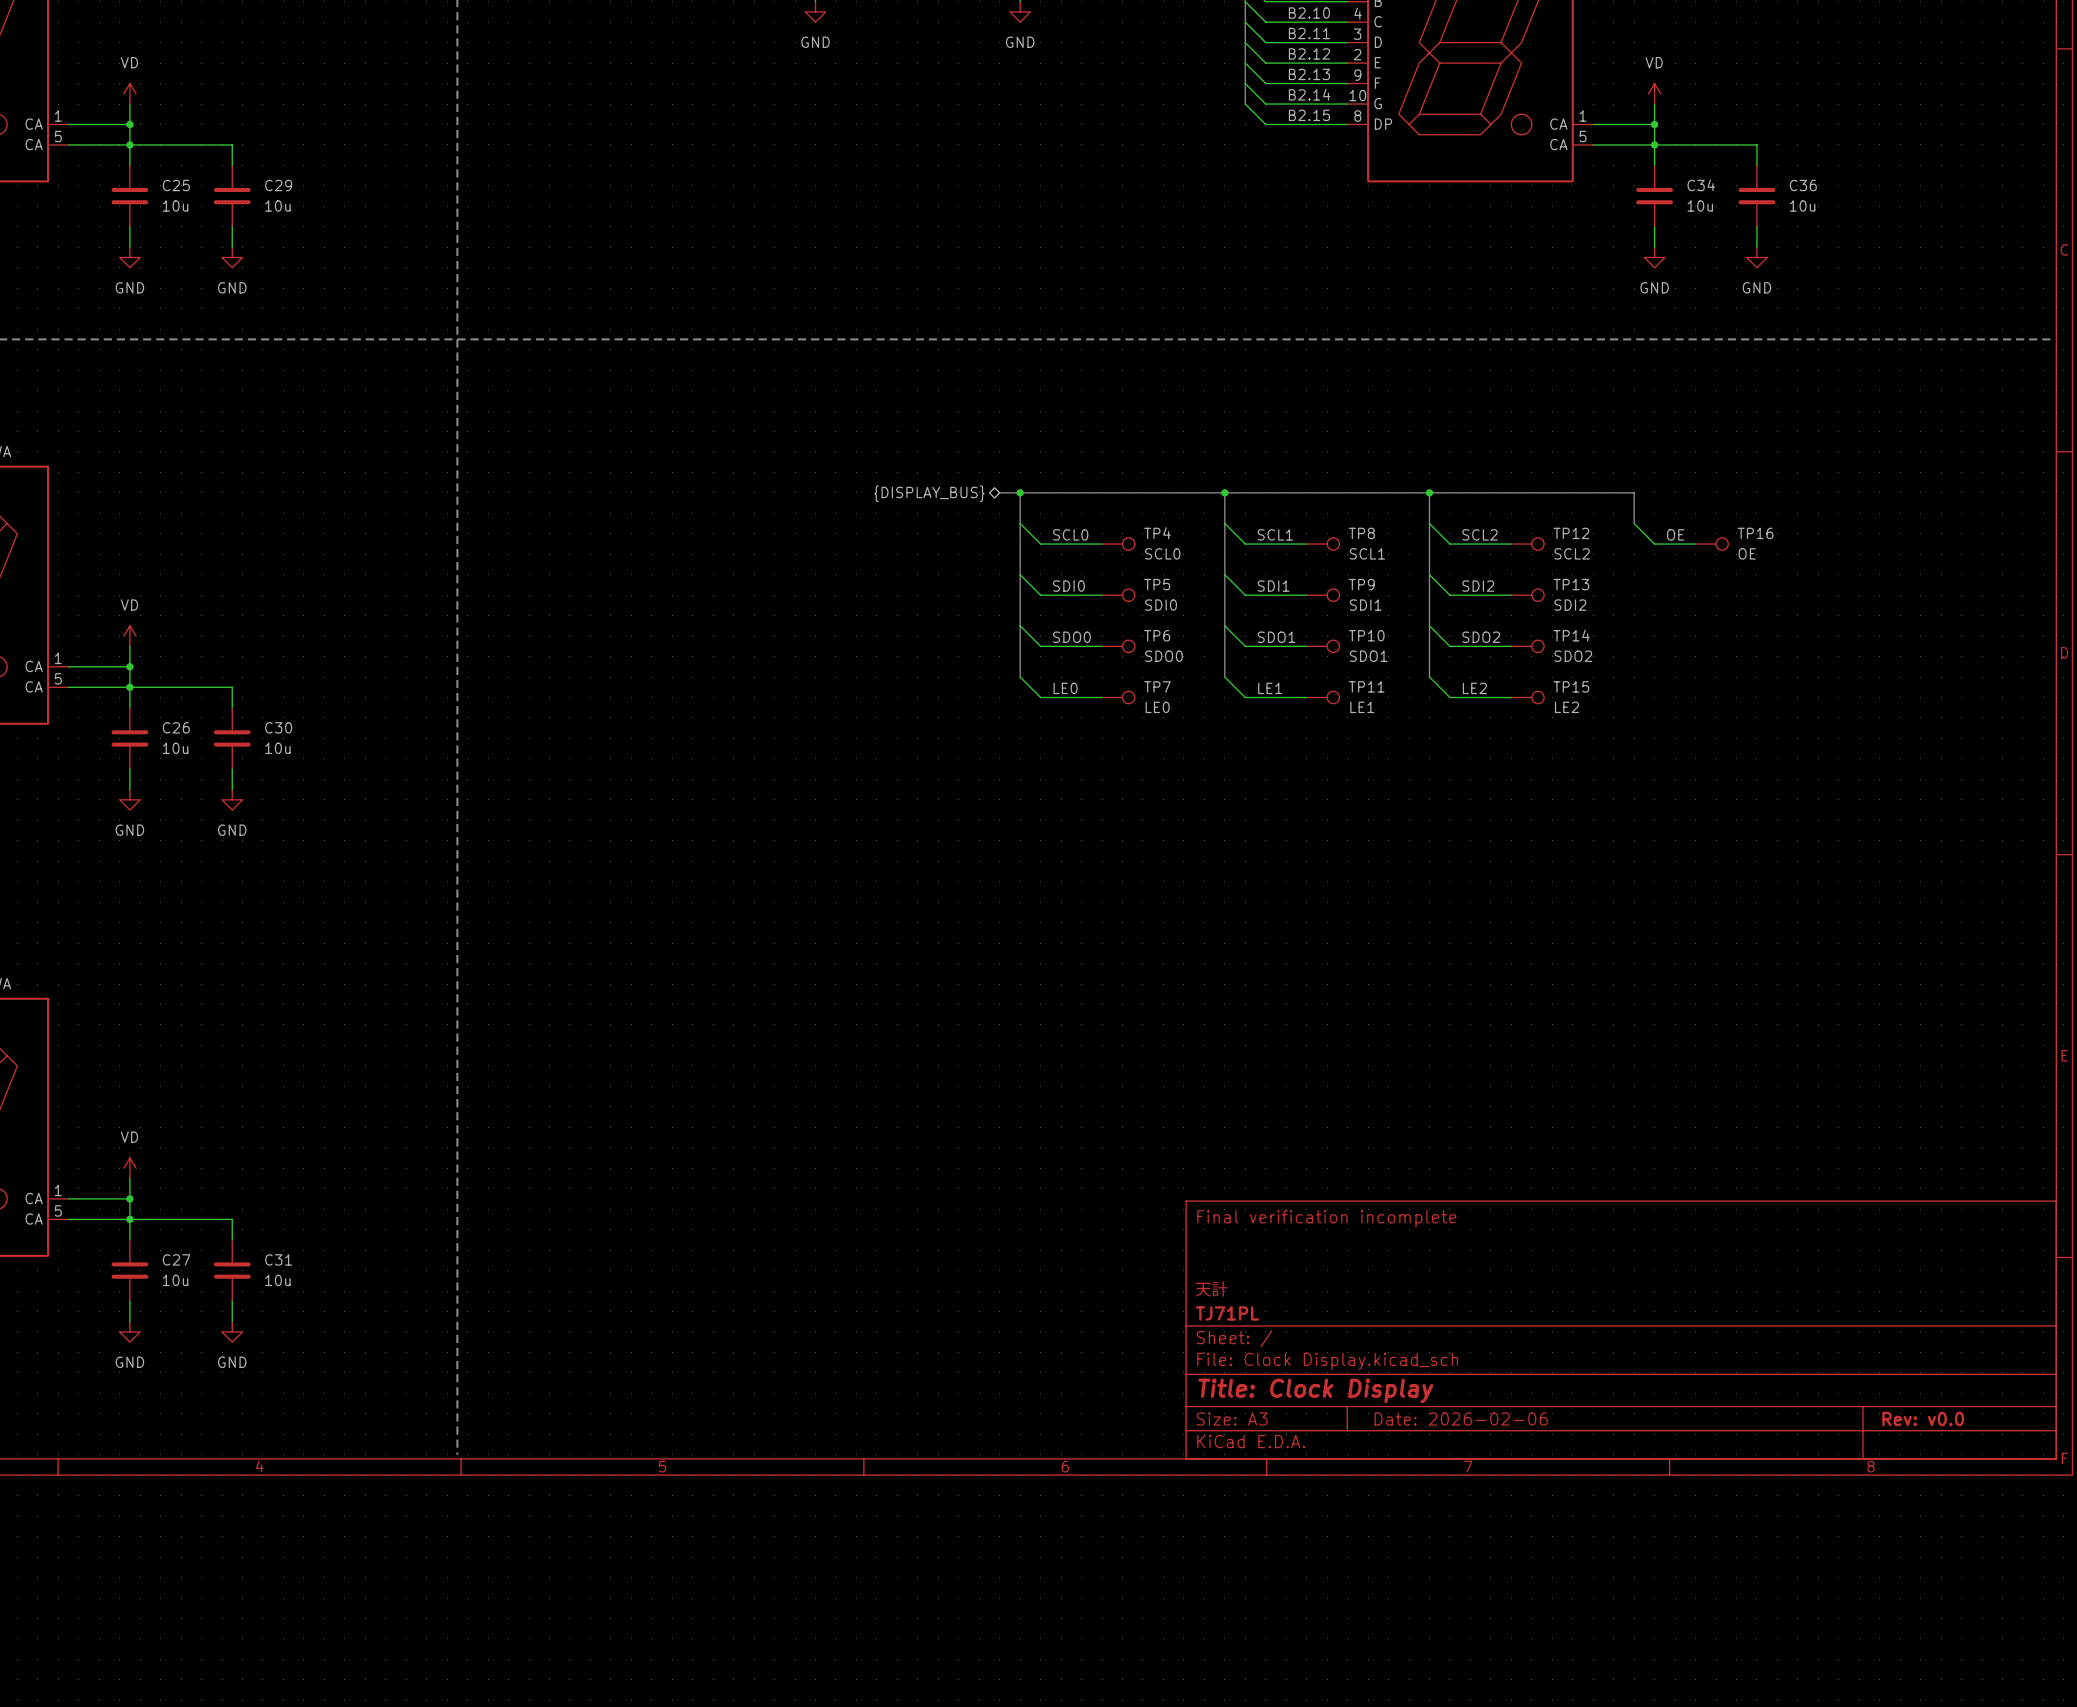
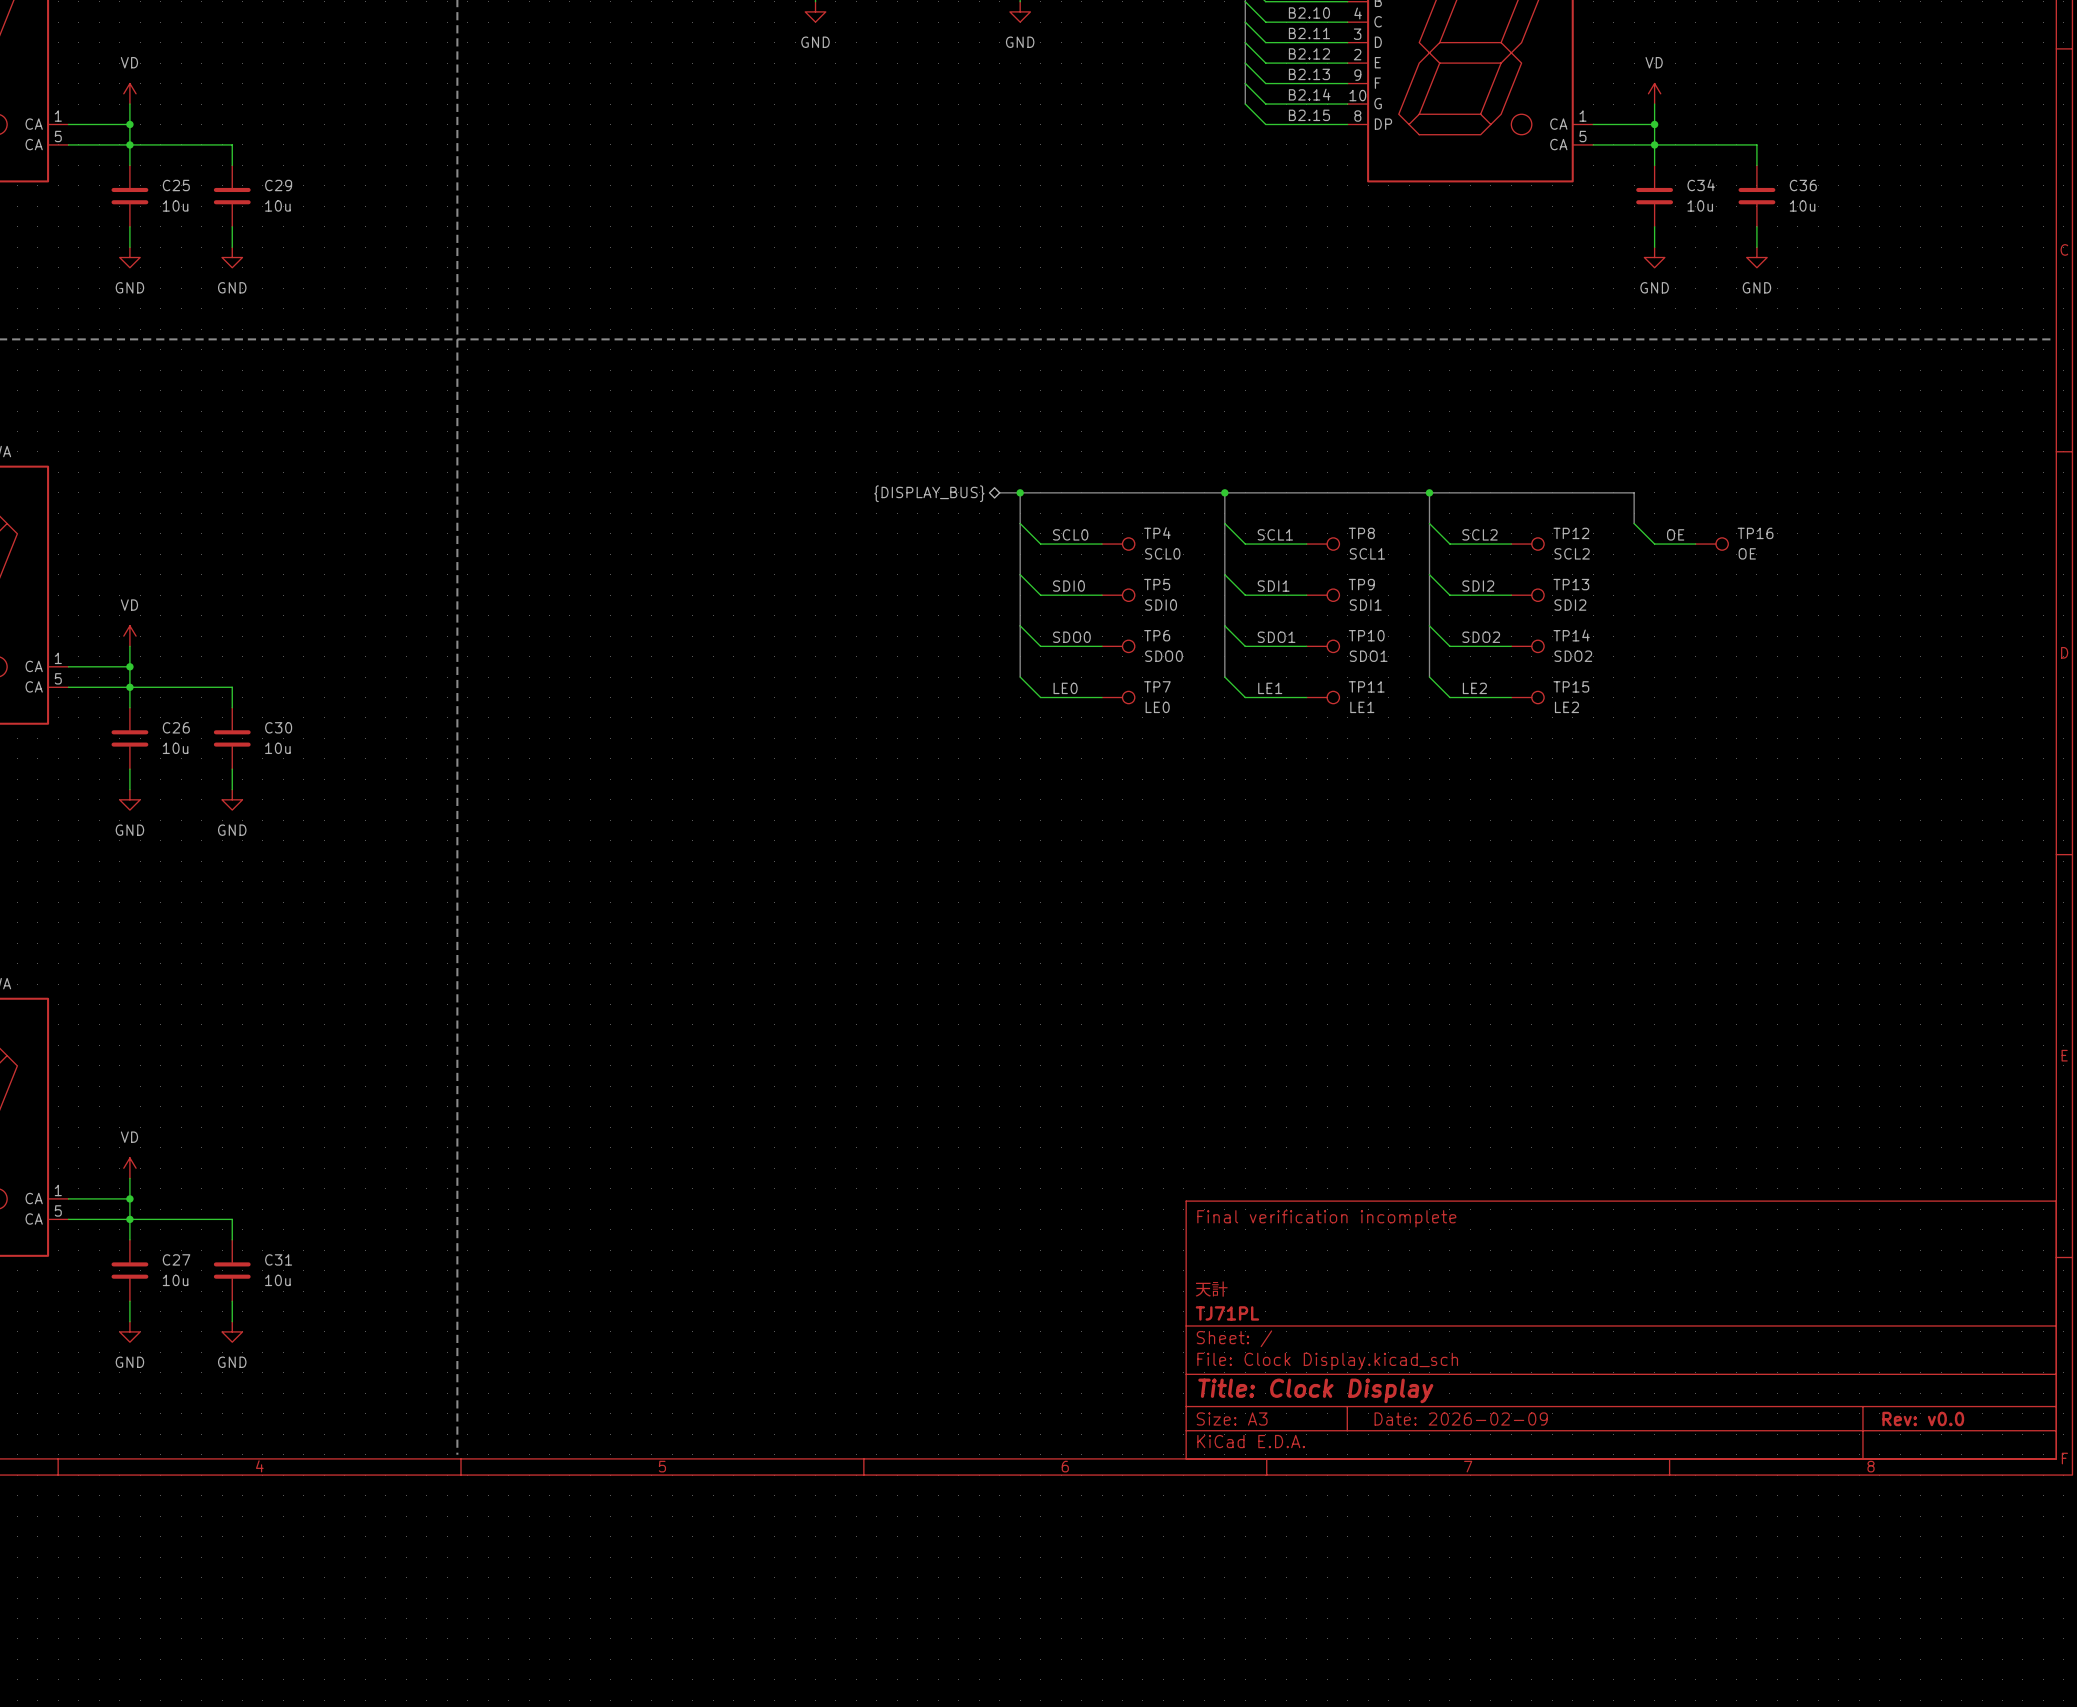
title block: Date: 2026-02-06 (1461, 1418) -> Date: 2026-02-09 (1461, 1418)

